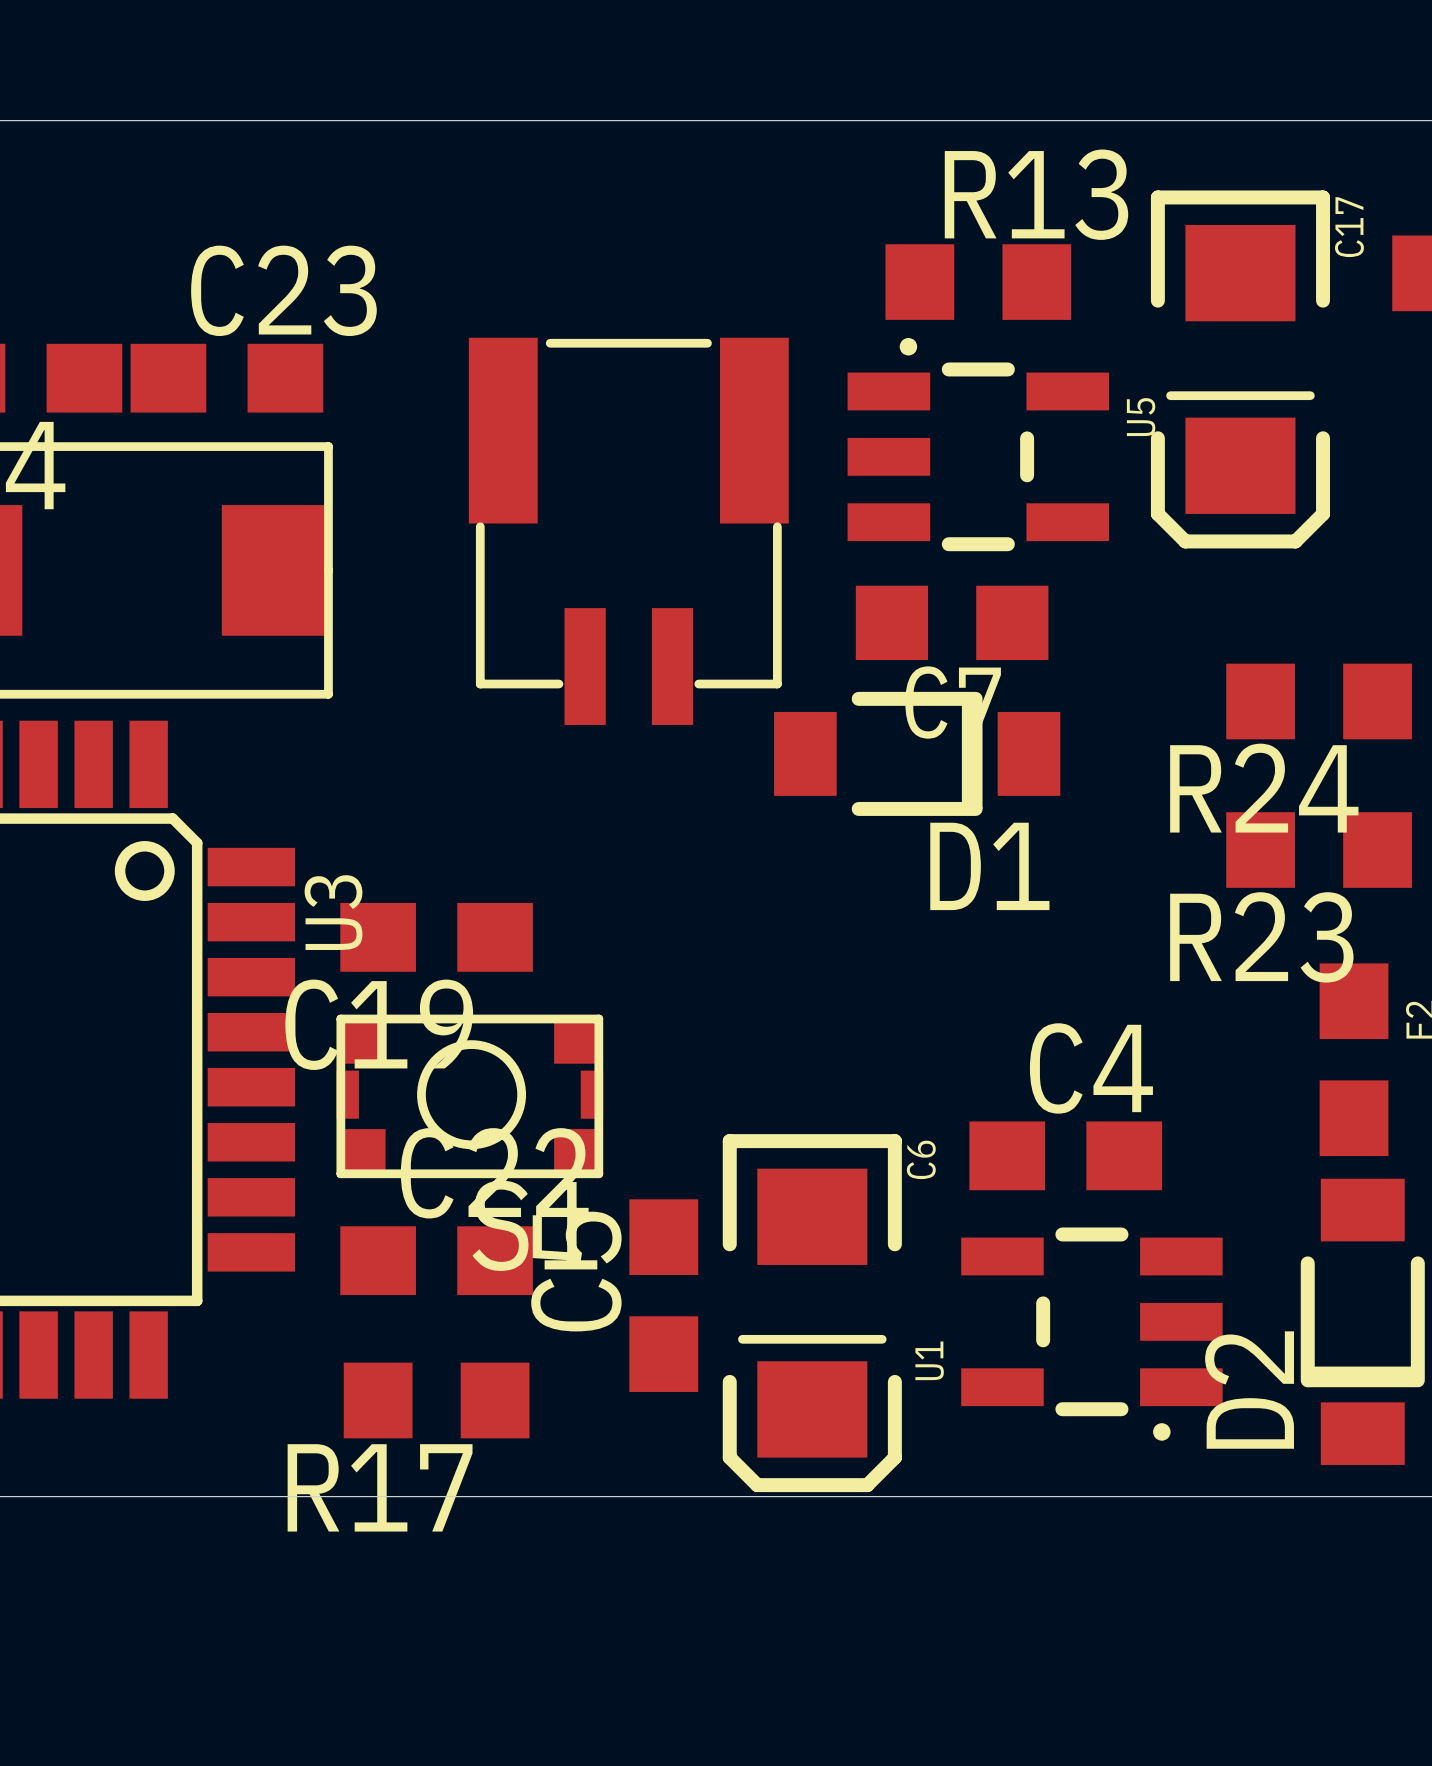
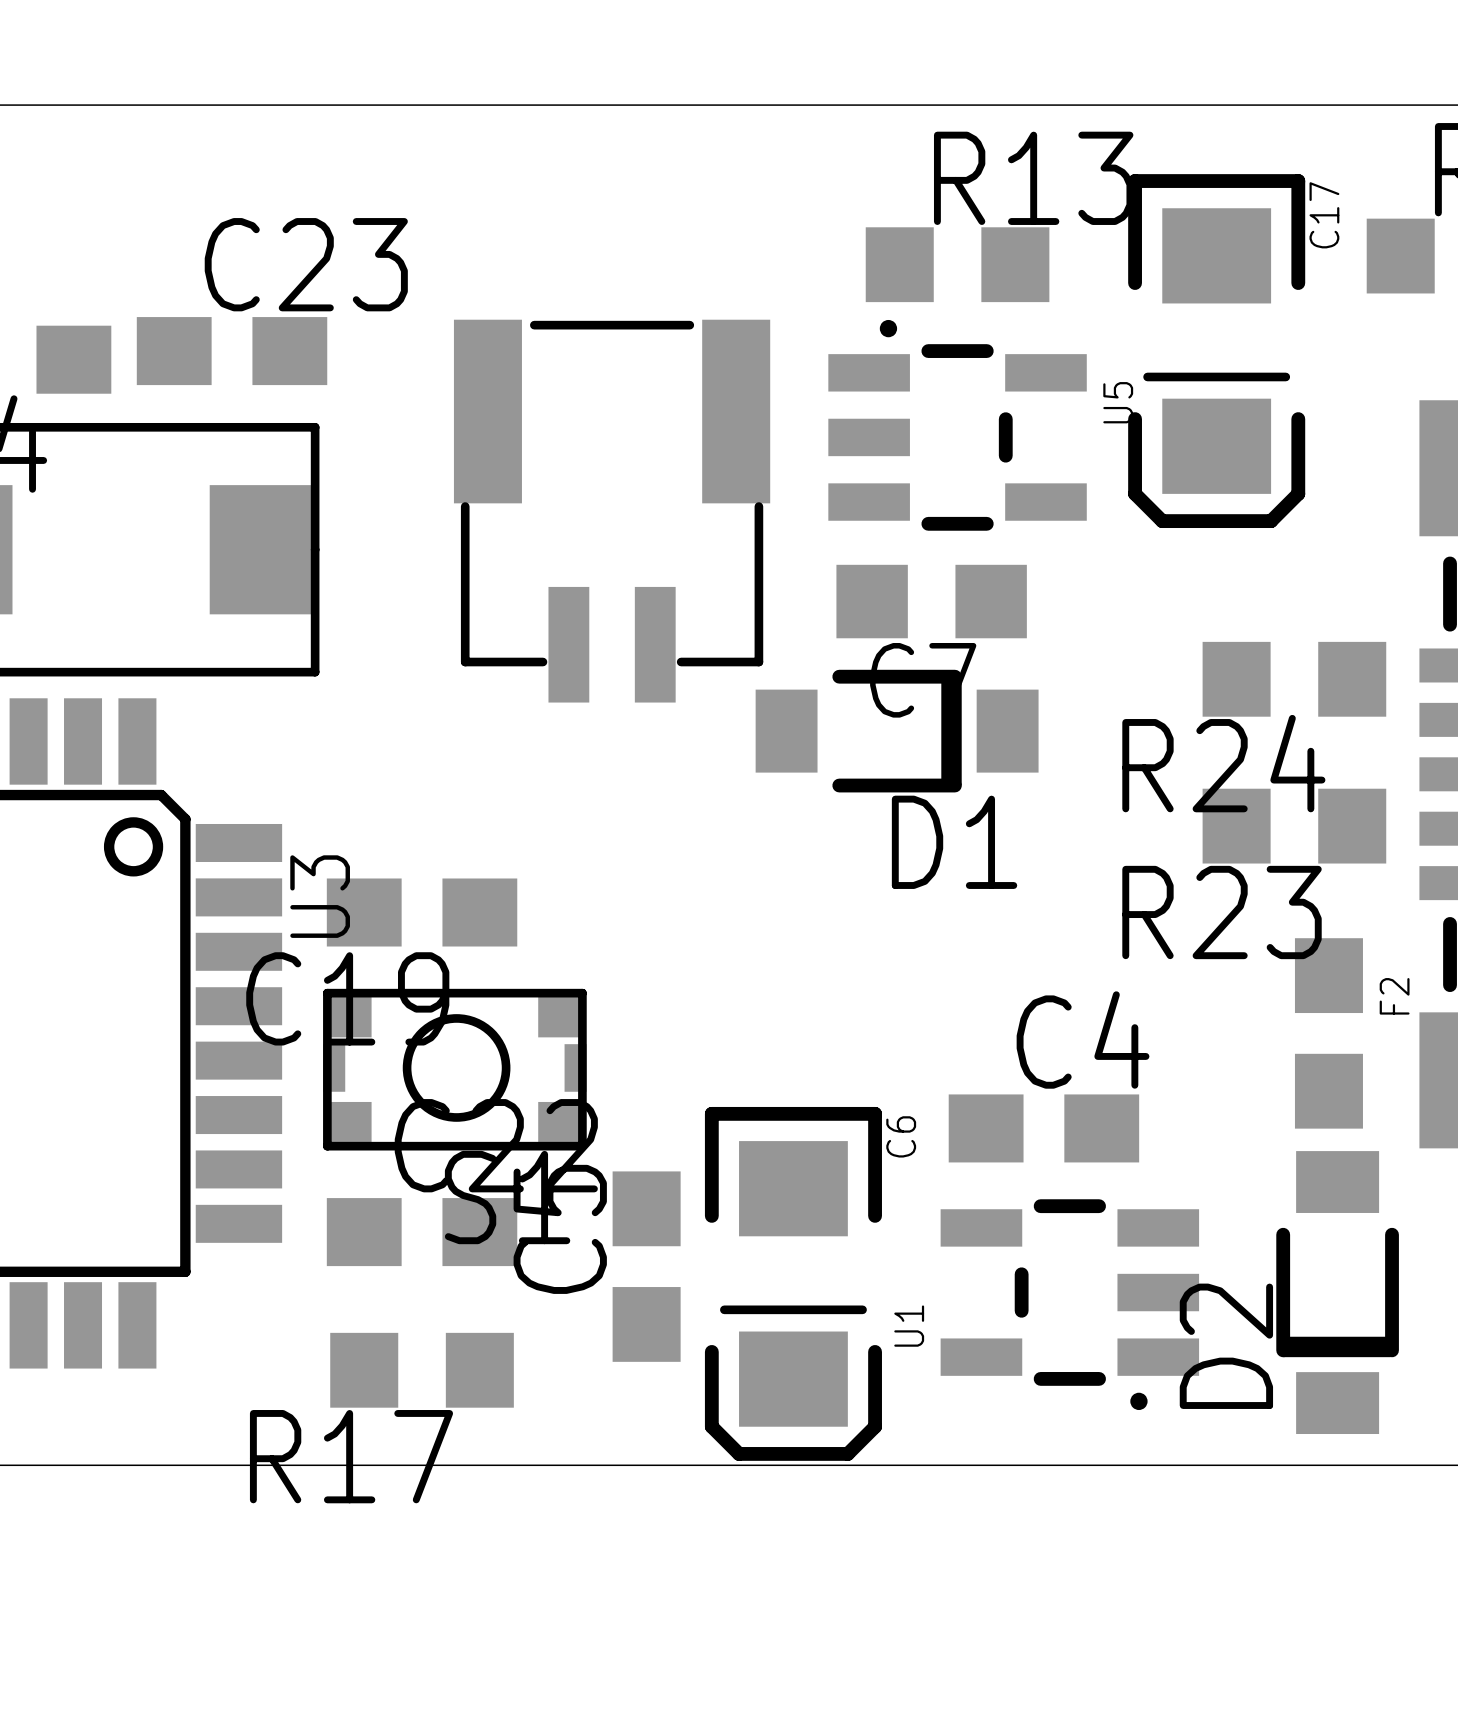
C23 position: (226, 378) -> (232, 351)

